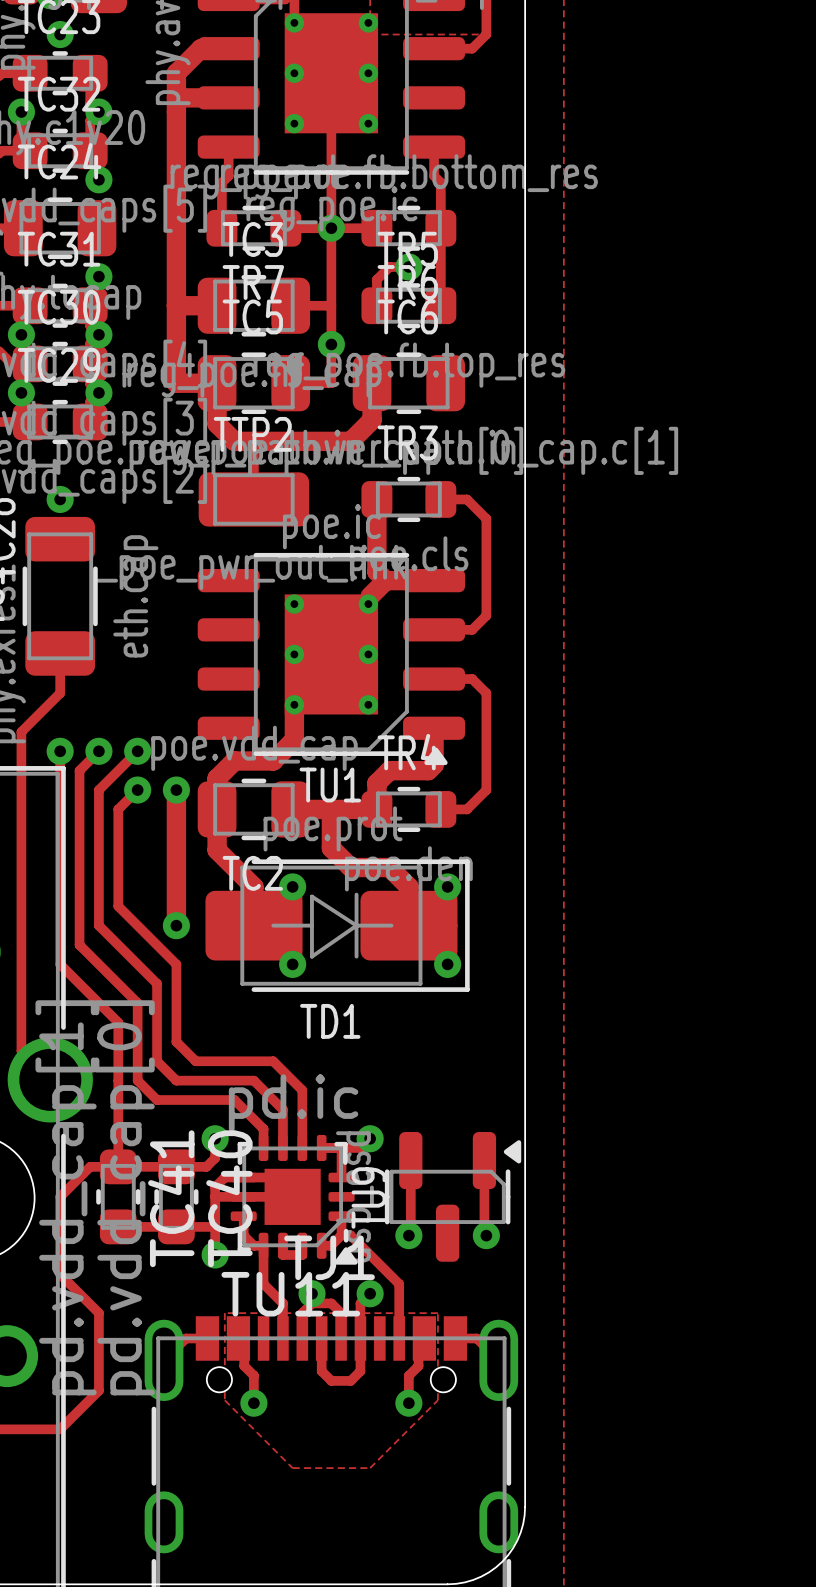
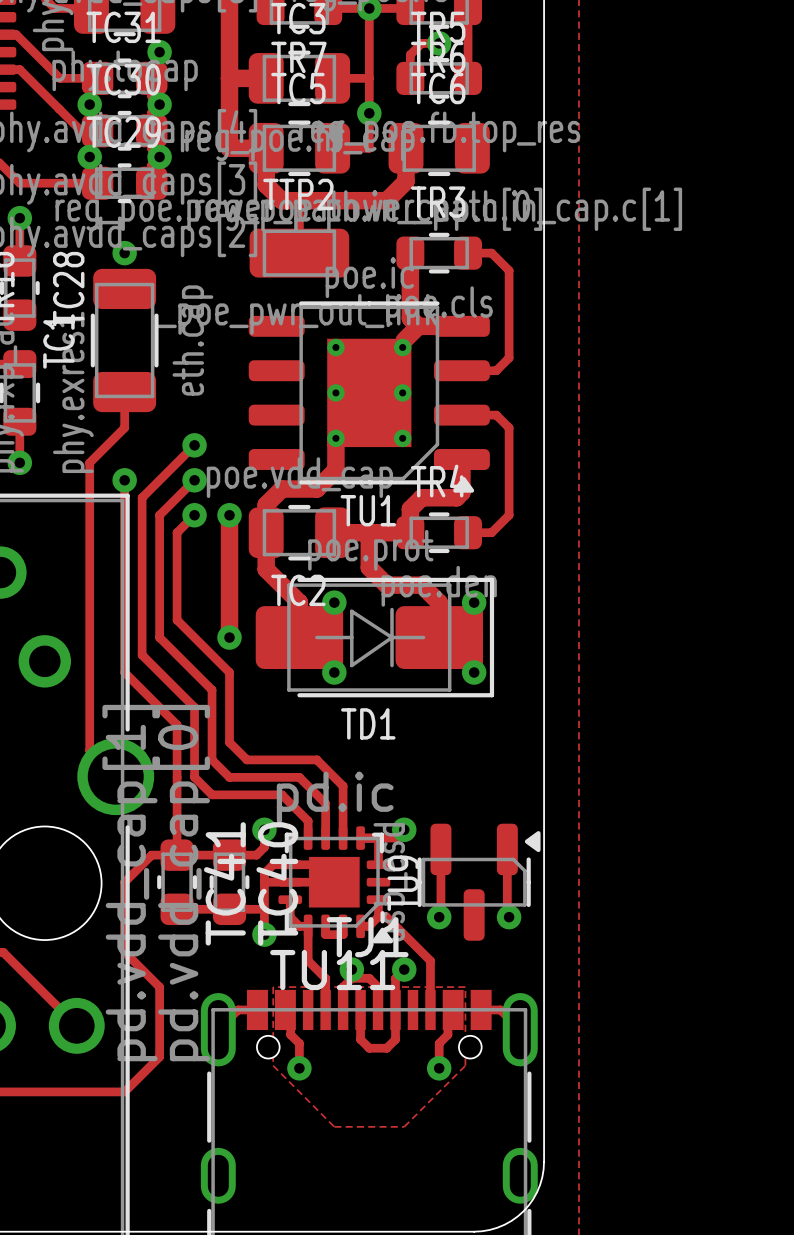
track: none -> (194, 445) (159, 480)
via position: (98, 751) -> (194, 445)

